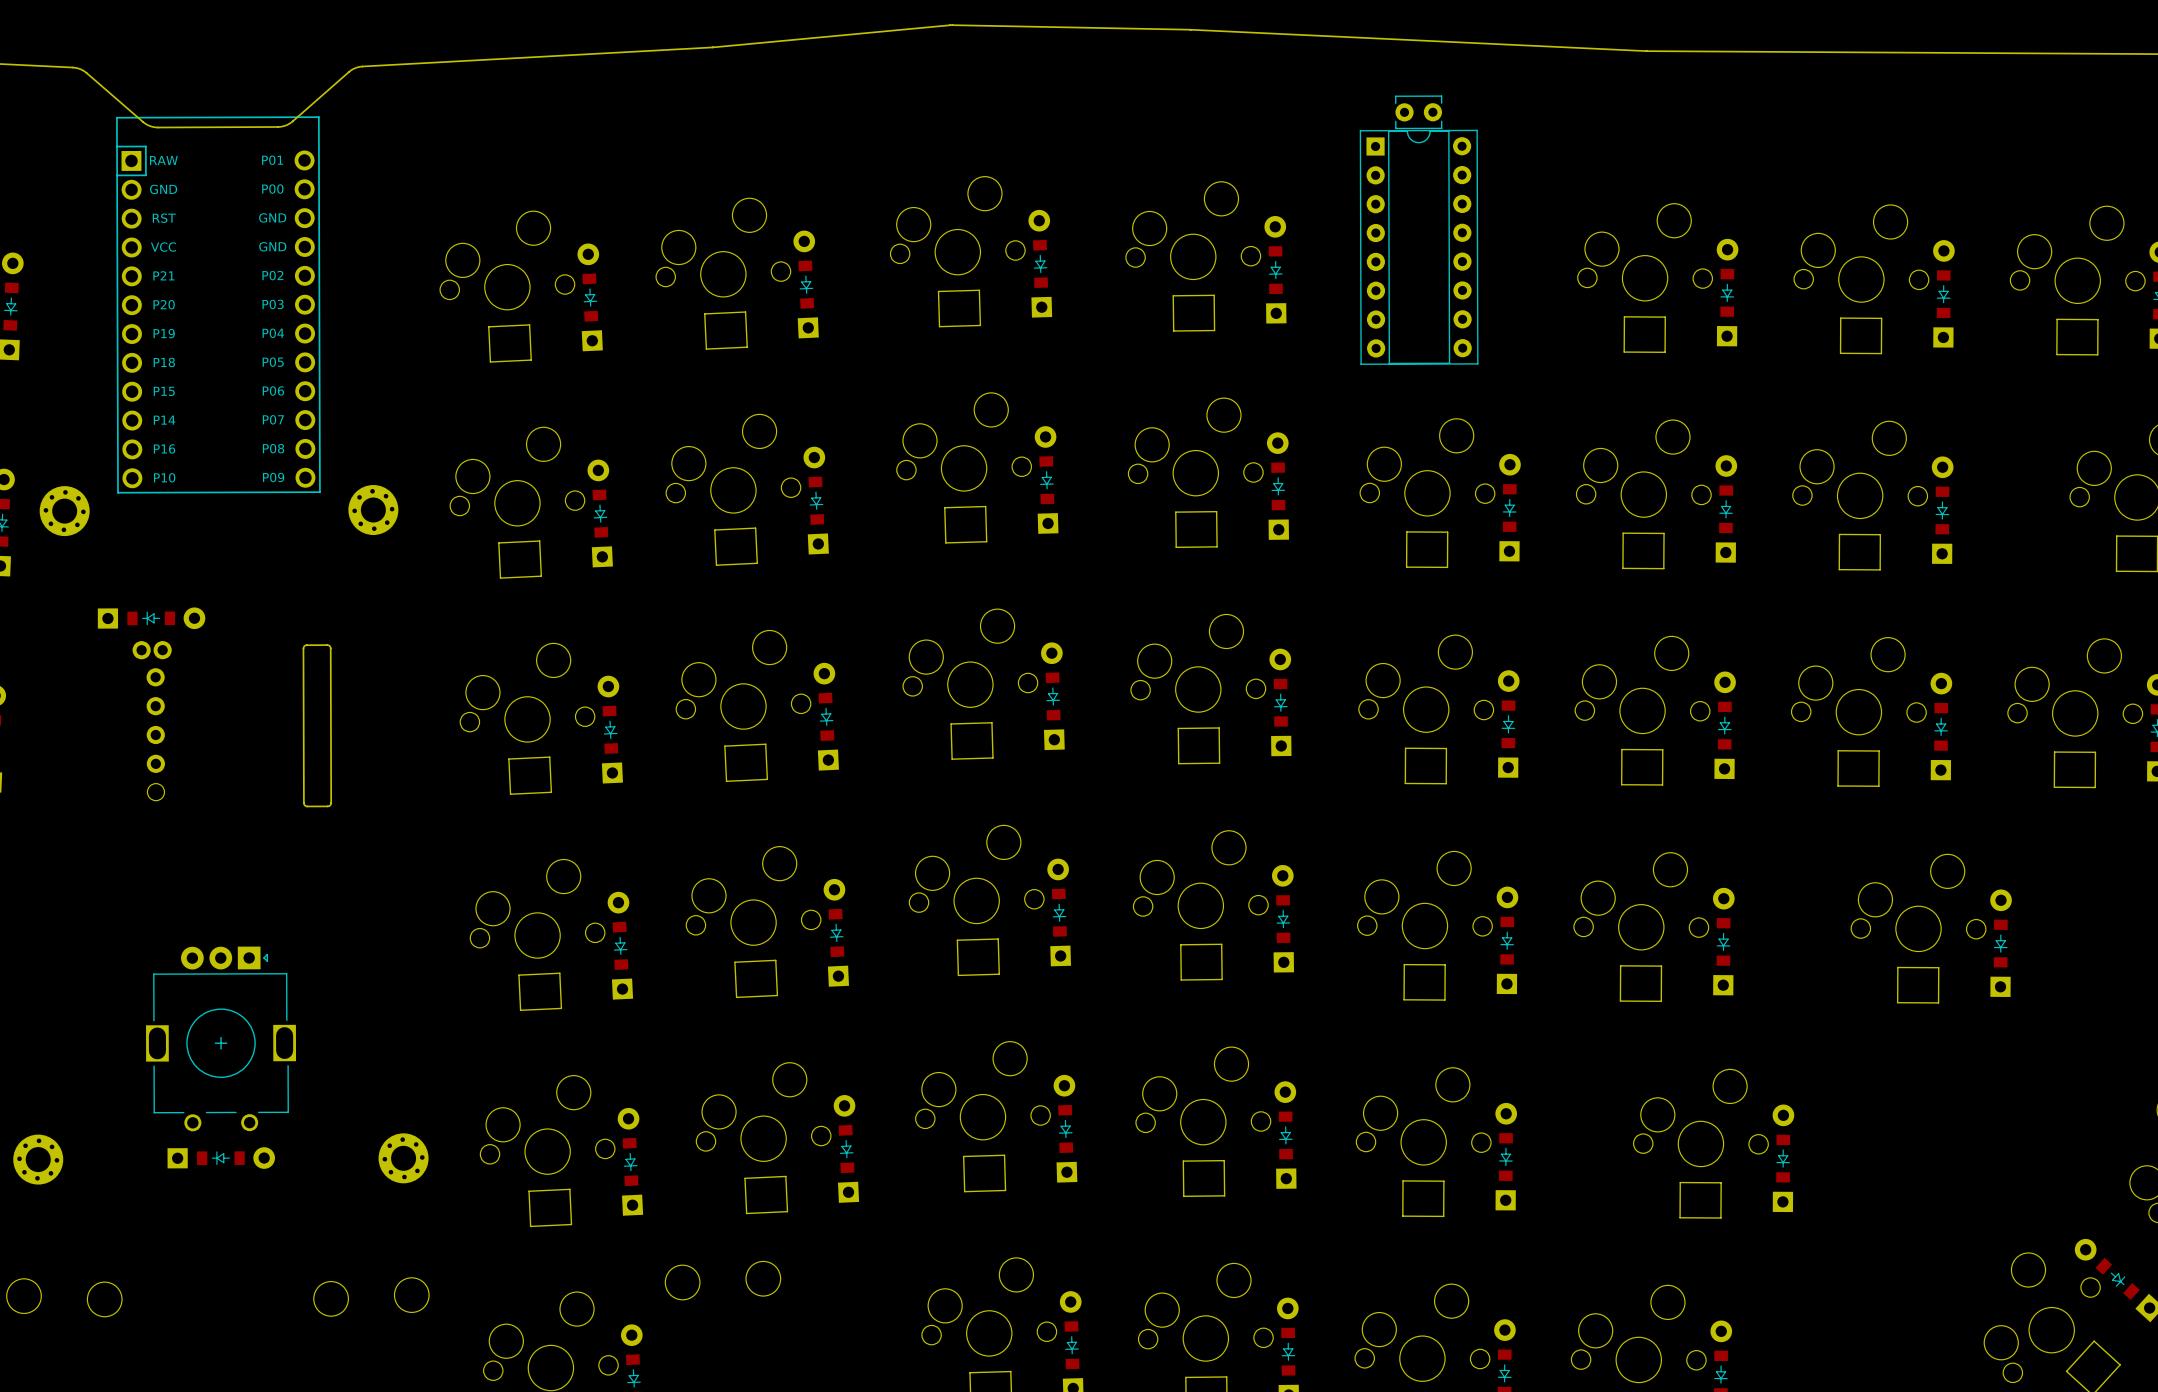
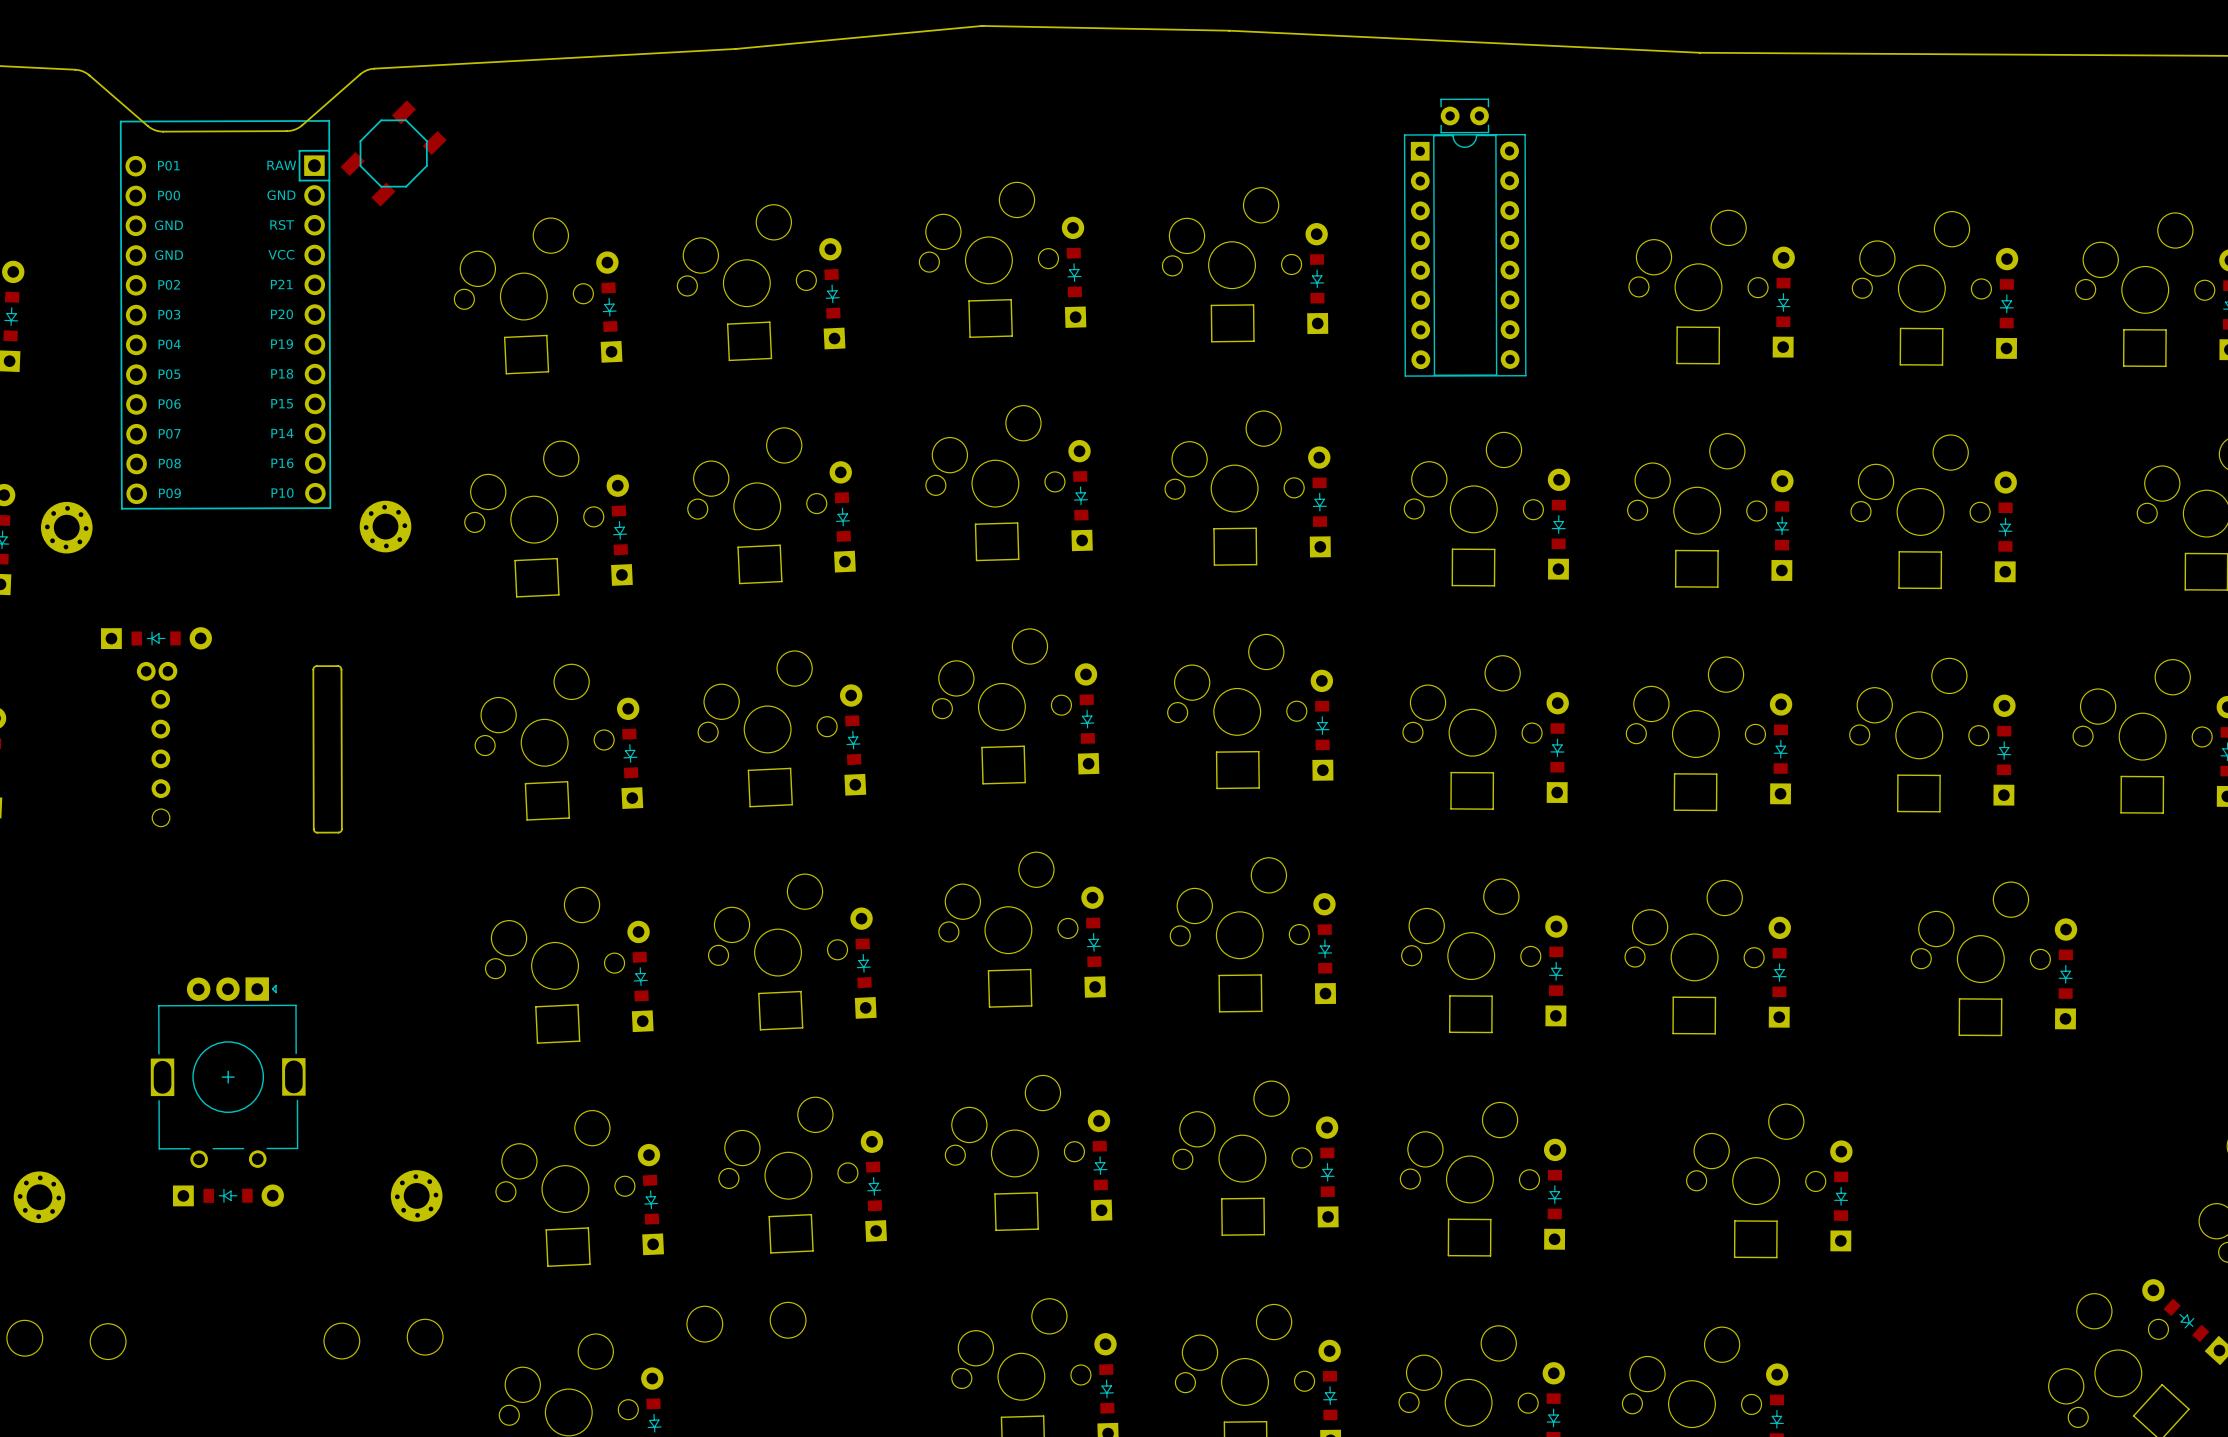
part footprint: [116, 116, 321, 494] -> [119, 120, 332, 510]
part: none -> (393, 153)

